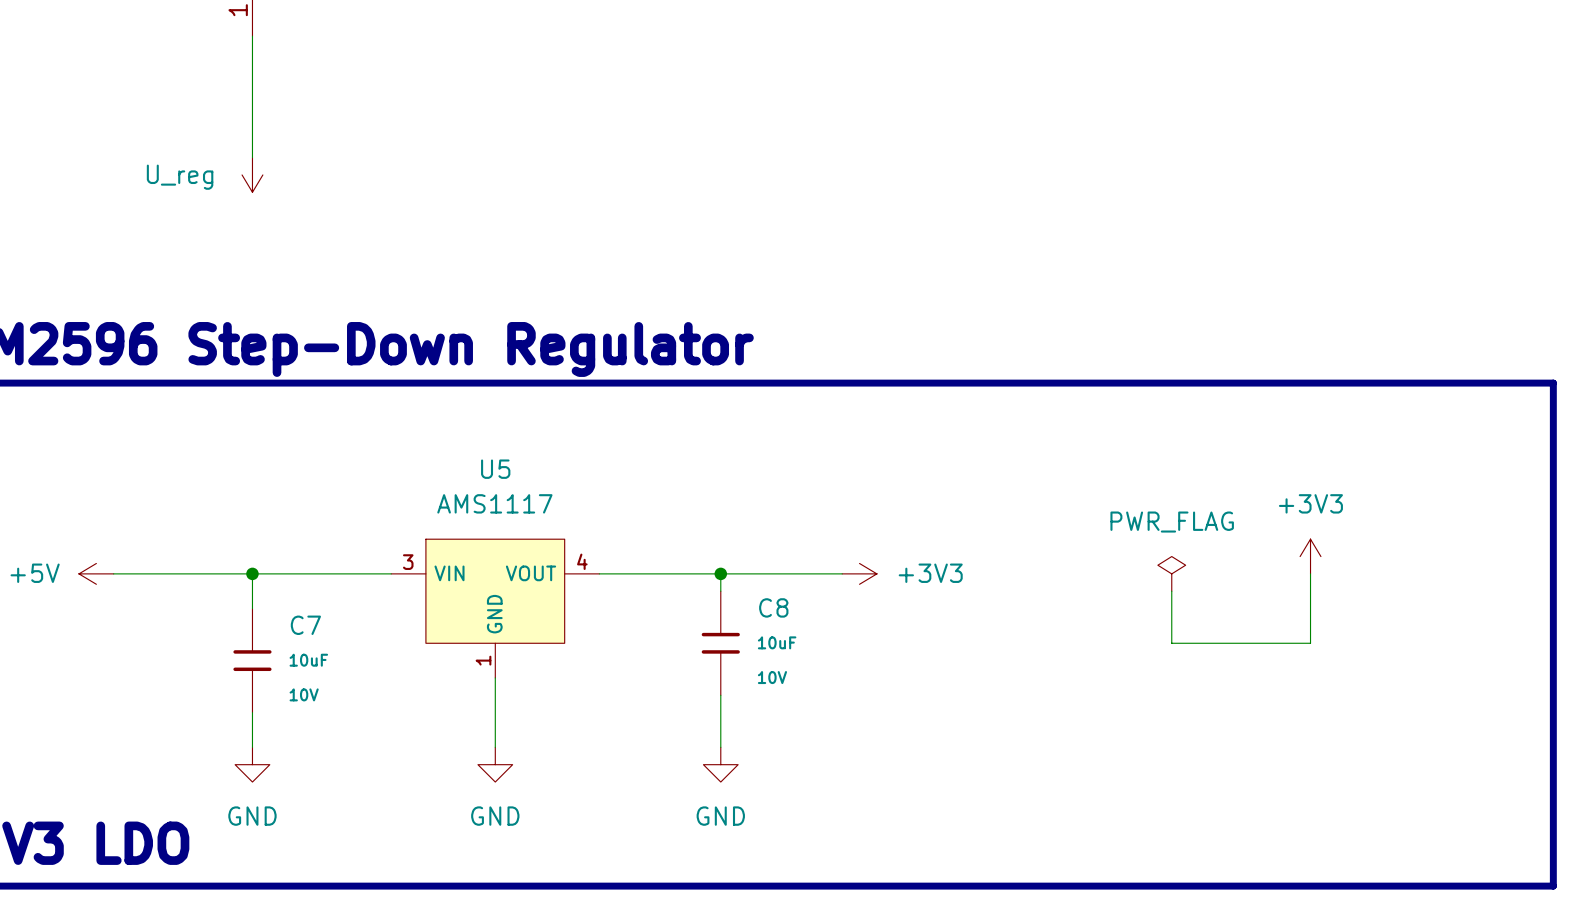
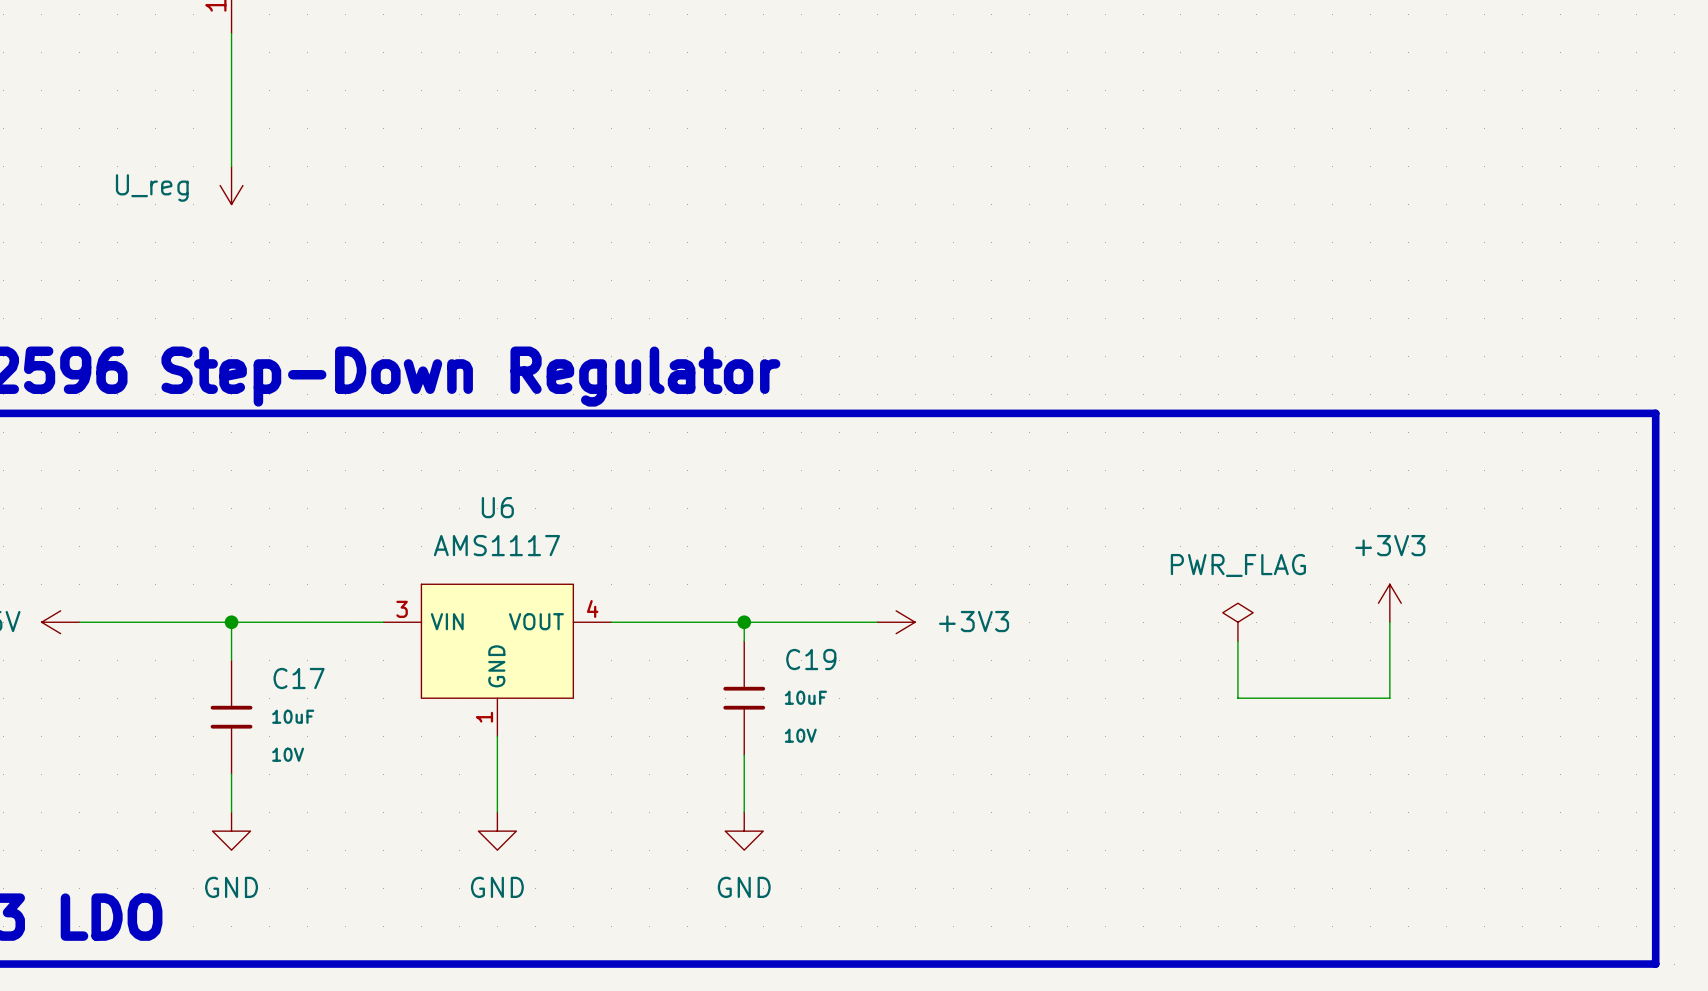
U5 name: U5 (495, 469) -> U6 (497, 507)
C8 name: C8 (773, 607) -> C19 (811, 659)
C7 name: C7 (305, 625) -> C17 (299, 678)

